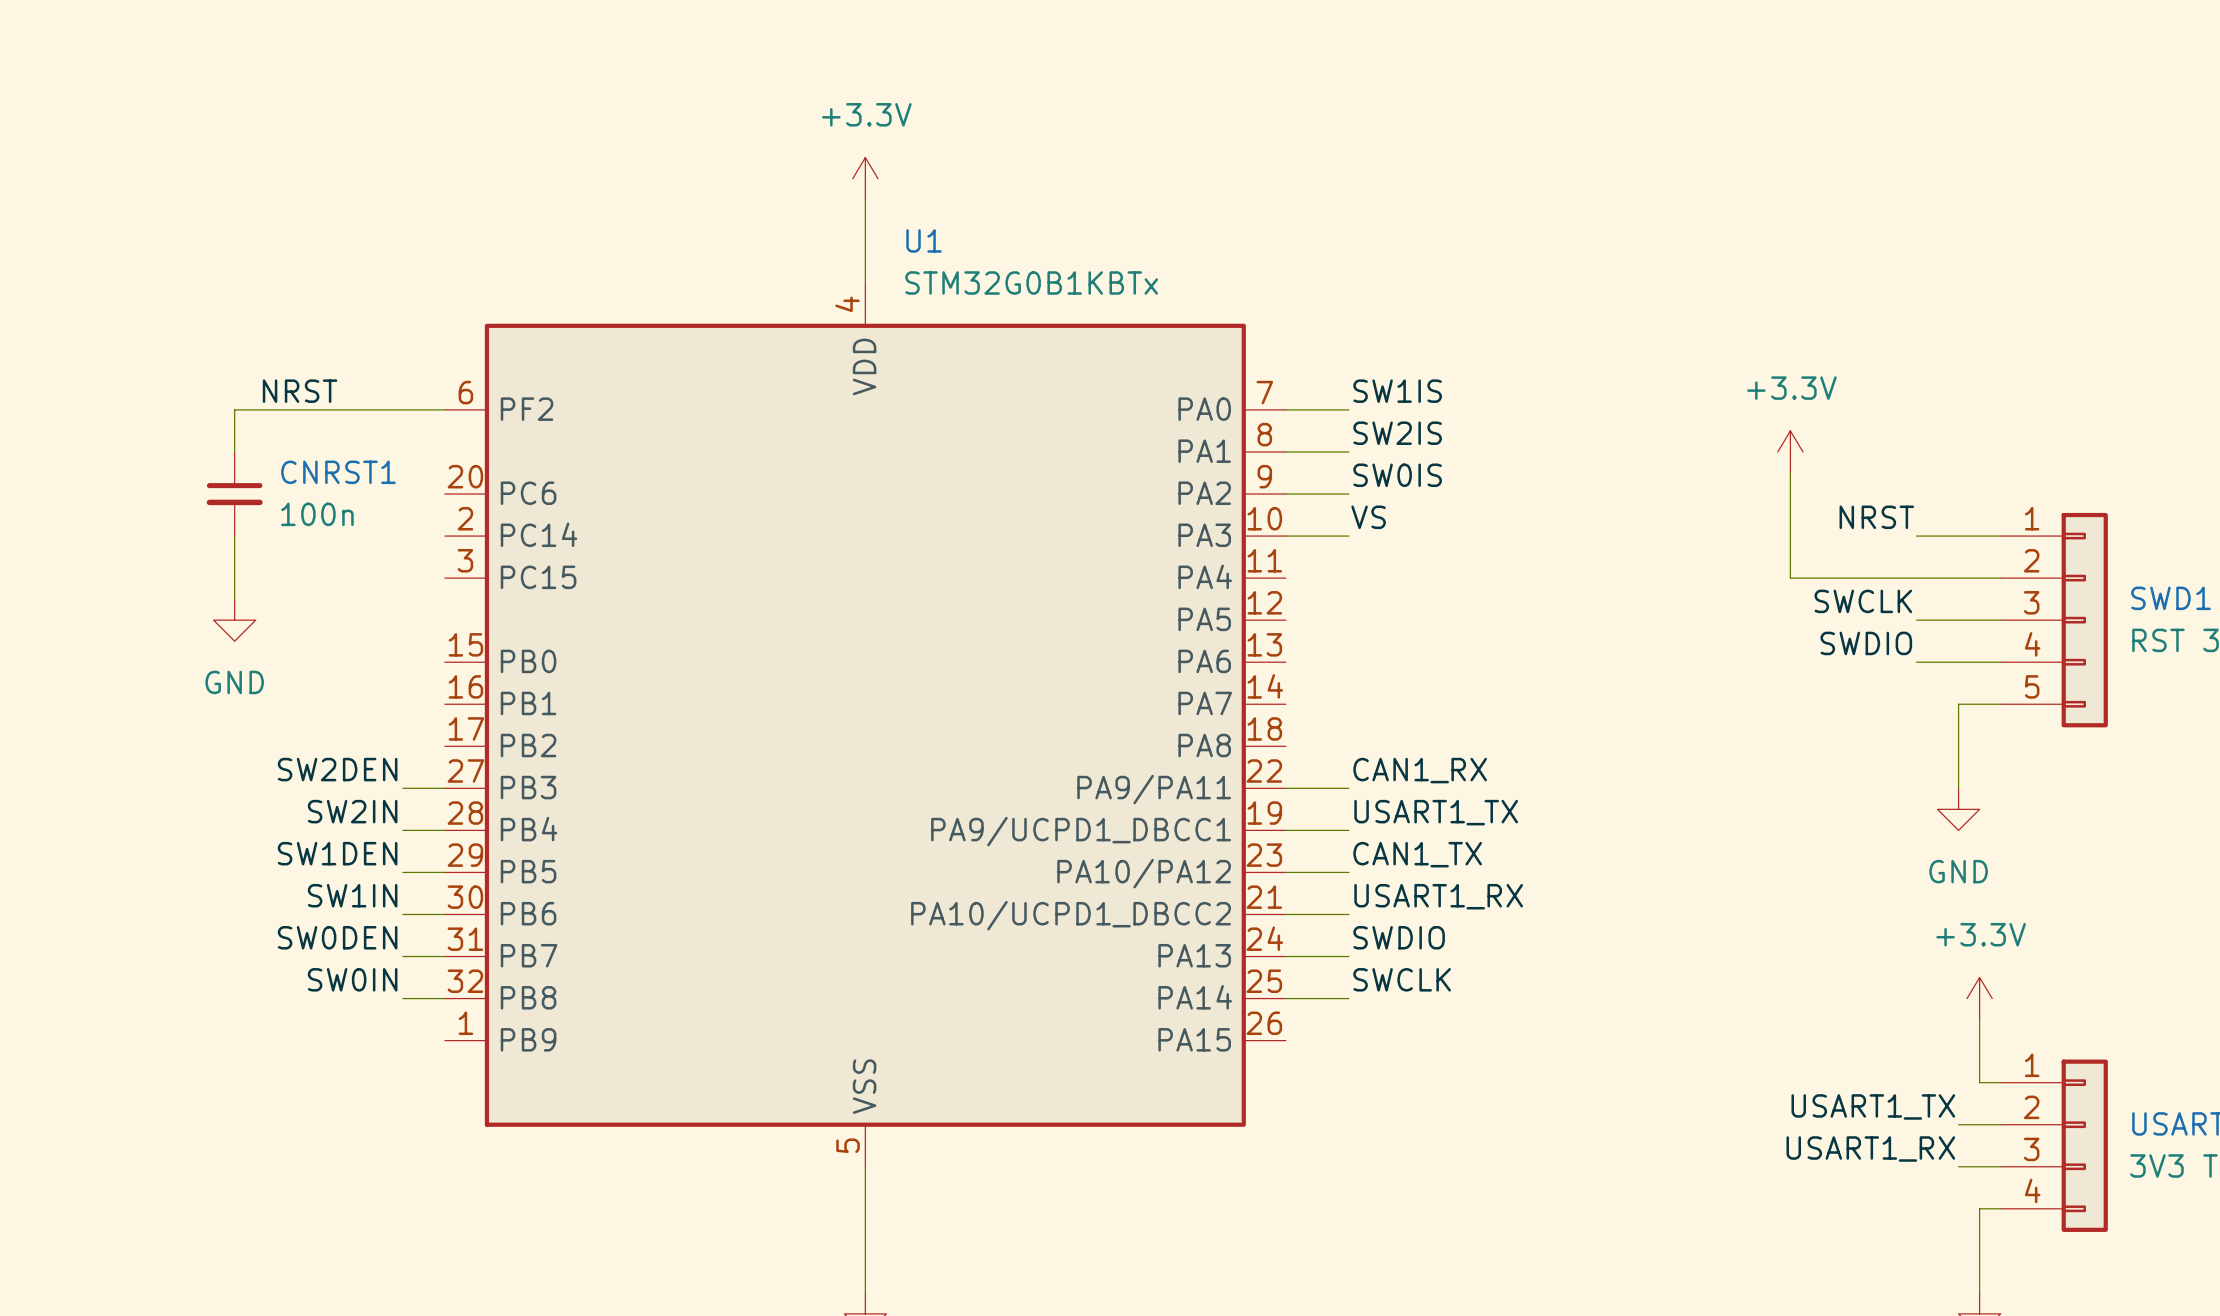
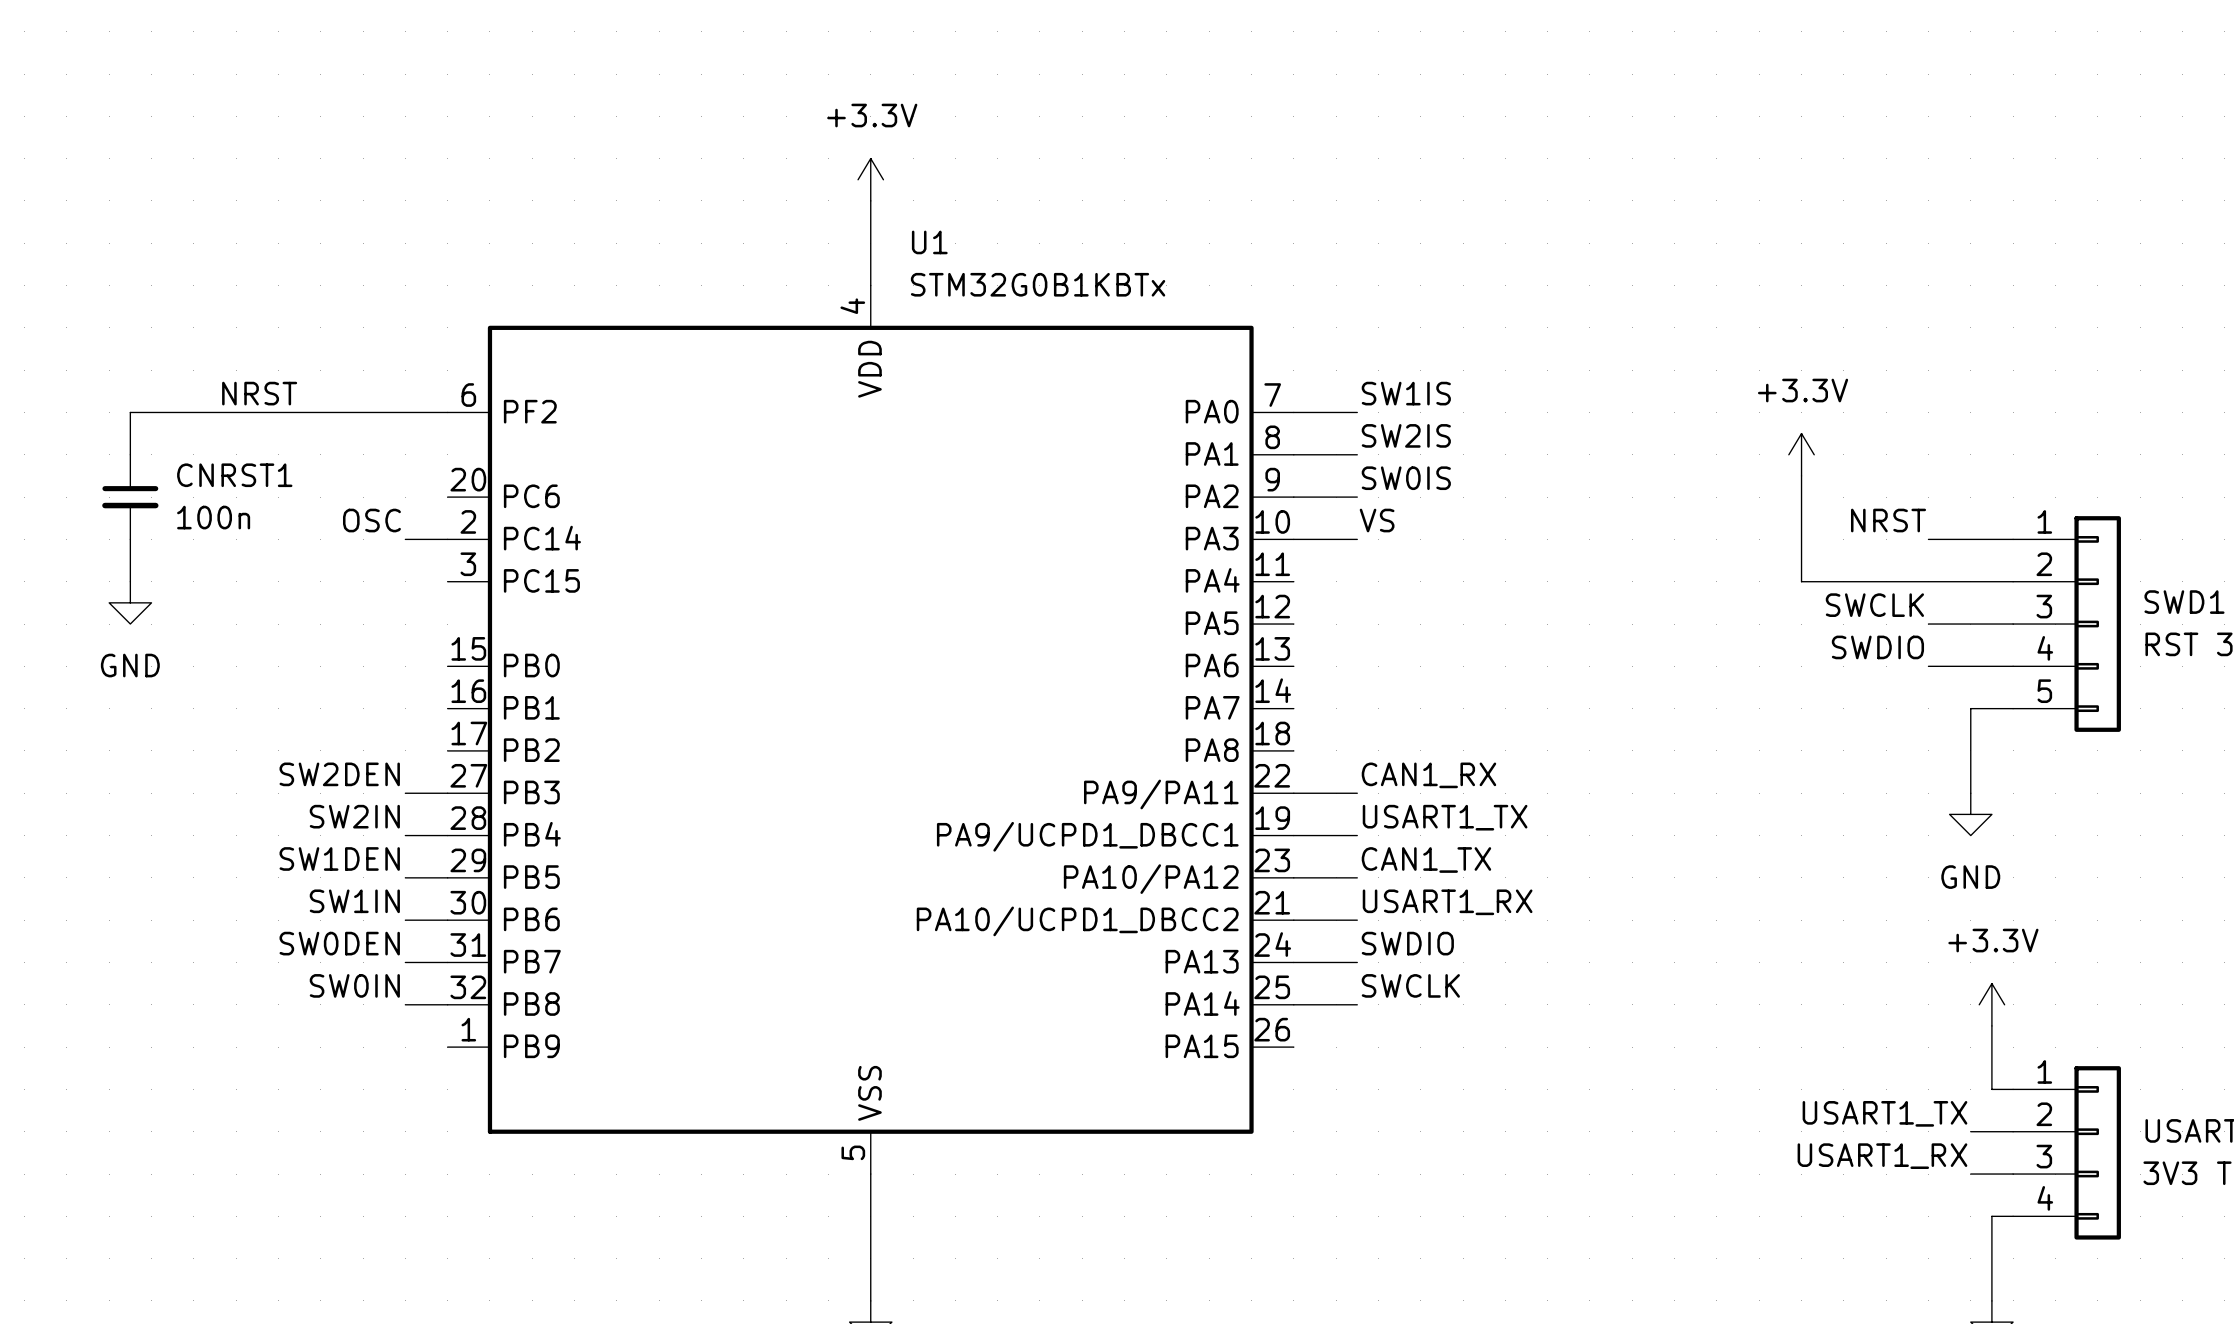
label position: NRST (300, 391) -> NRST (259, 393)
wire: (234, 409) (234, 451) -> (236, 412) (130, 412) (130, 454)
CNRST1 position: (234, 494) -> (130, 497)
label: none -> OSC (371, 520)
wire: none -> (130, 539) (130, 581)
wire: (234, 536) (234, 599) -> none
wire: none -> (405, 539) (447, 539)
power symbol position: GND (234, 620) -> GND (130, 602)

